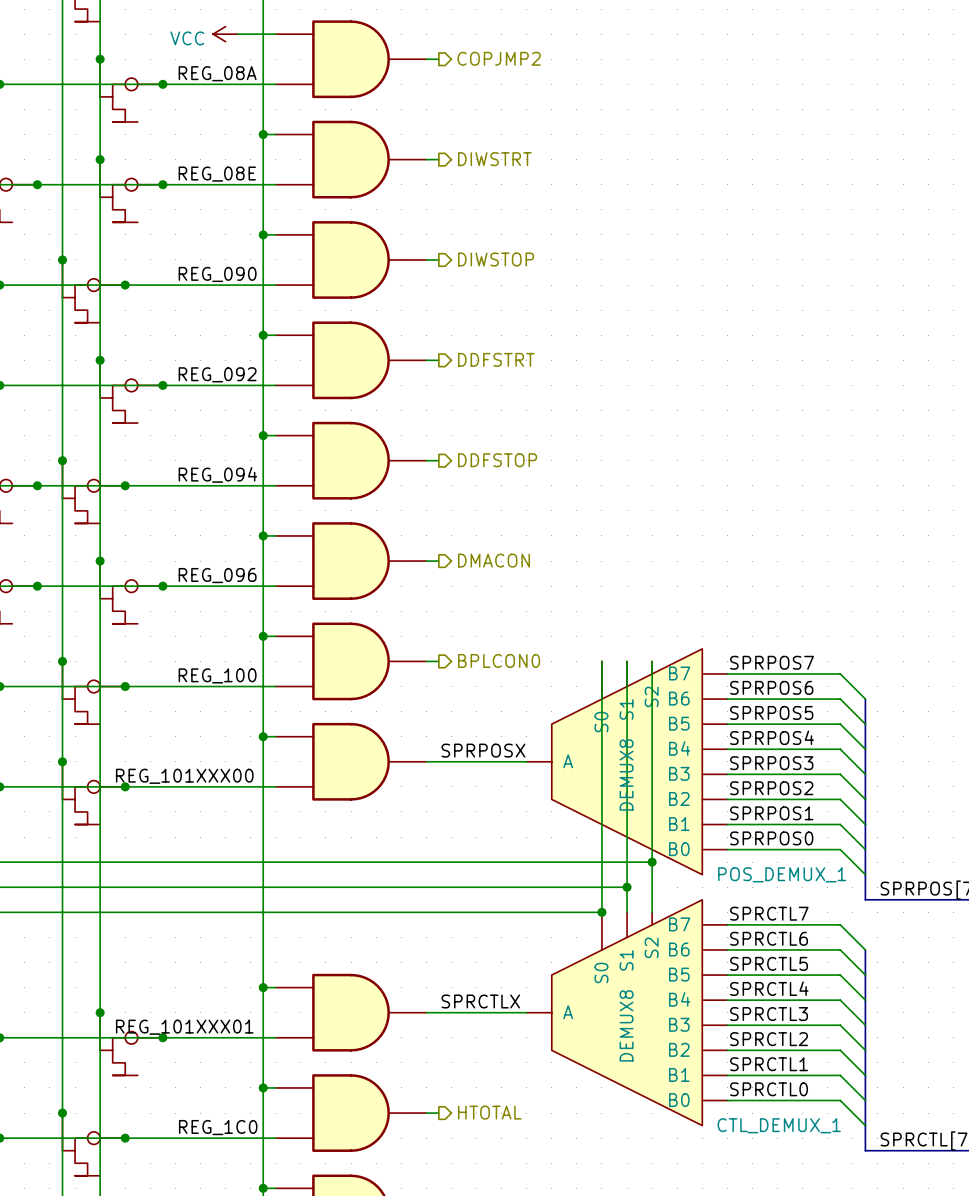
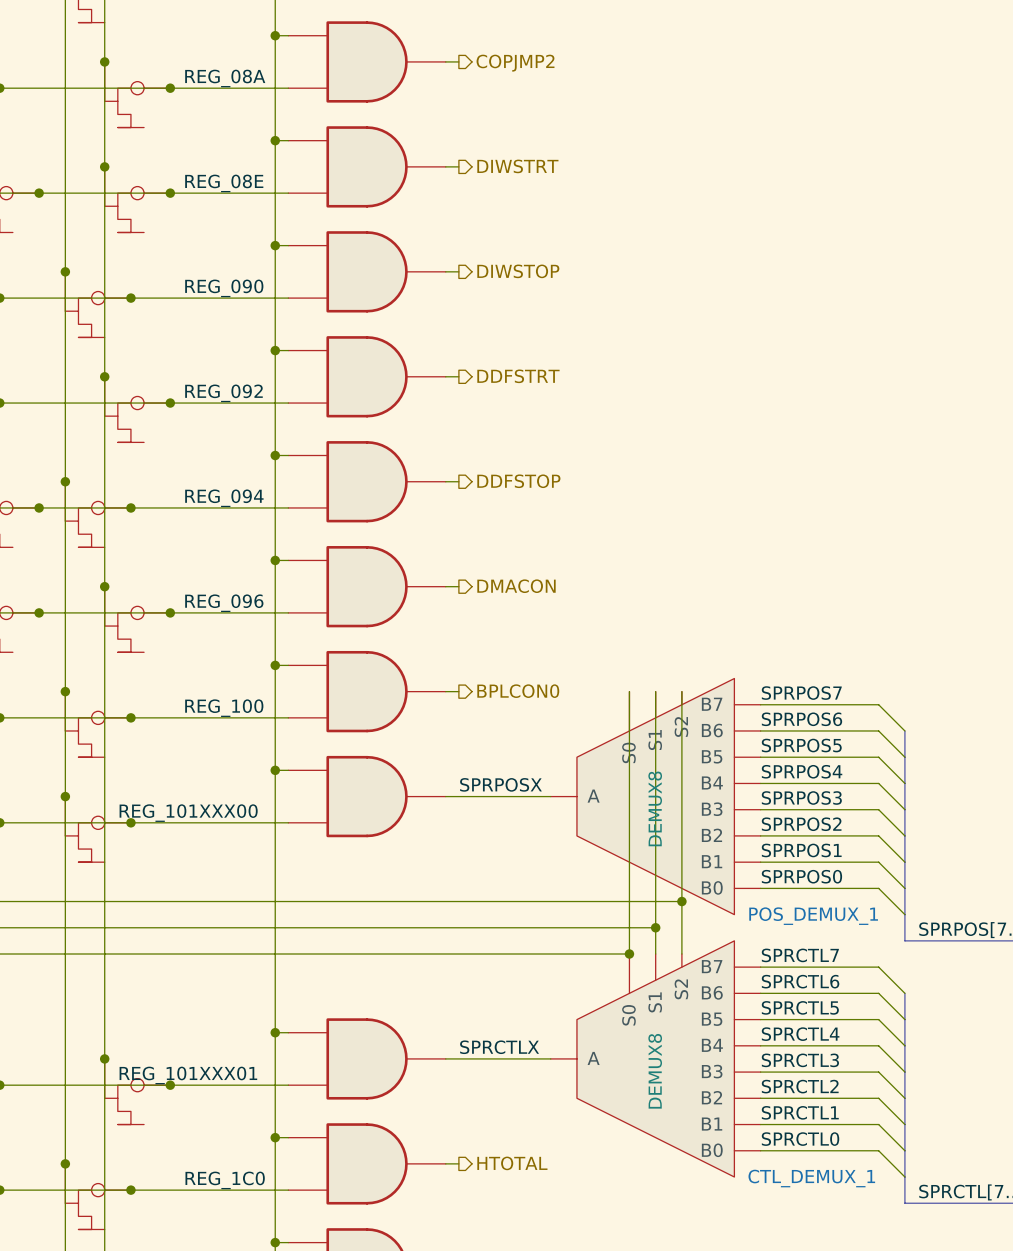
power symbol: VCC (225, 34) -> none
wire: (238, 34) (263, 34) -> none
junction: none -> (275, 35)

